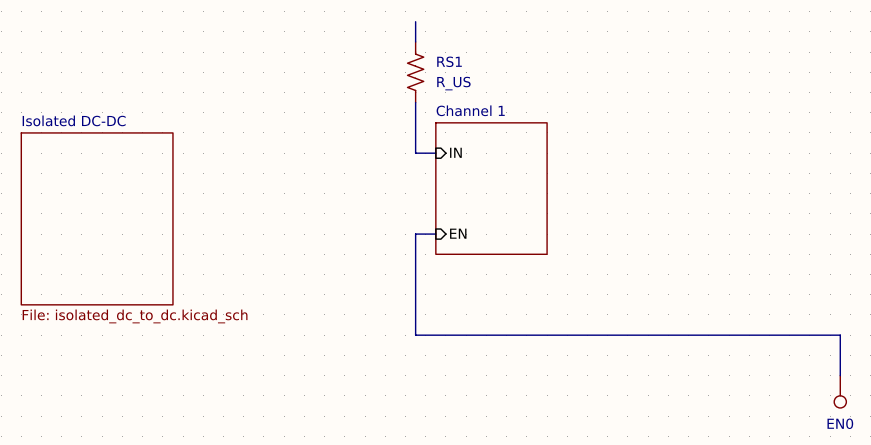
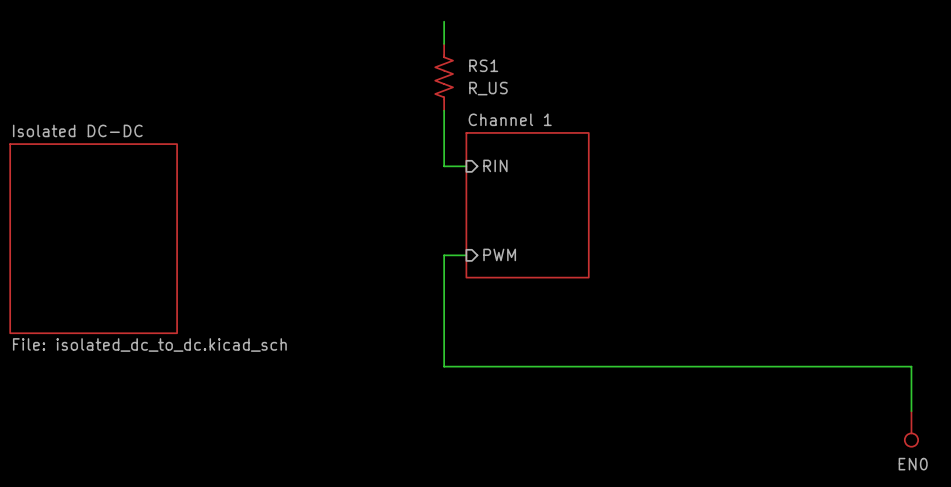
sheet pin: IN (455, 152) -> RIN (495, 165)
sheet pin: EN (458, 233) -> PWM (499, 254)

